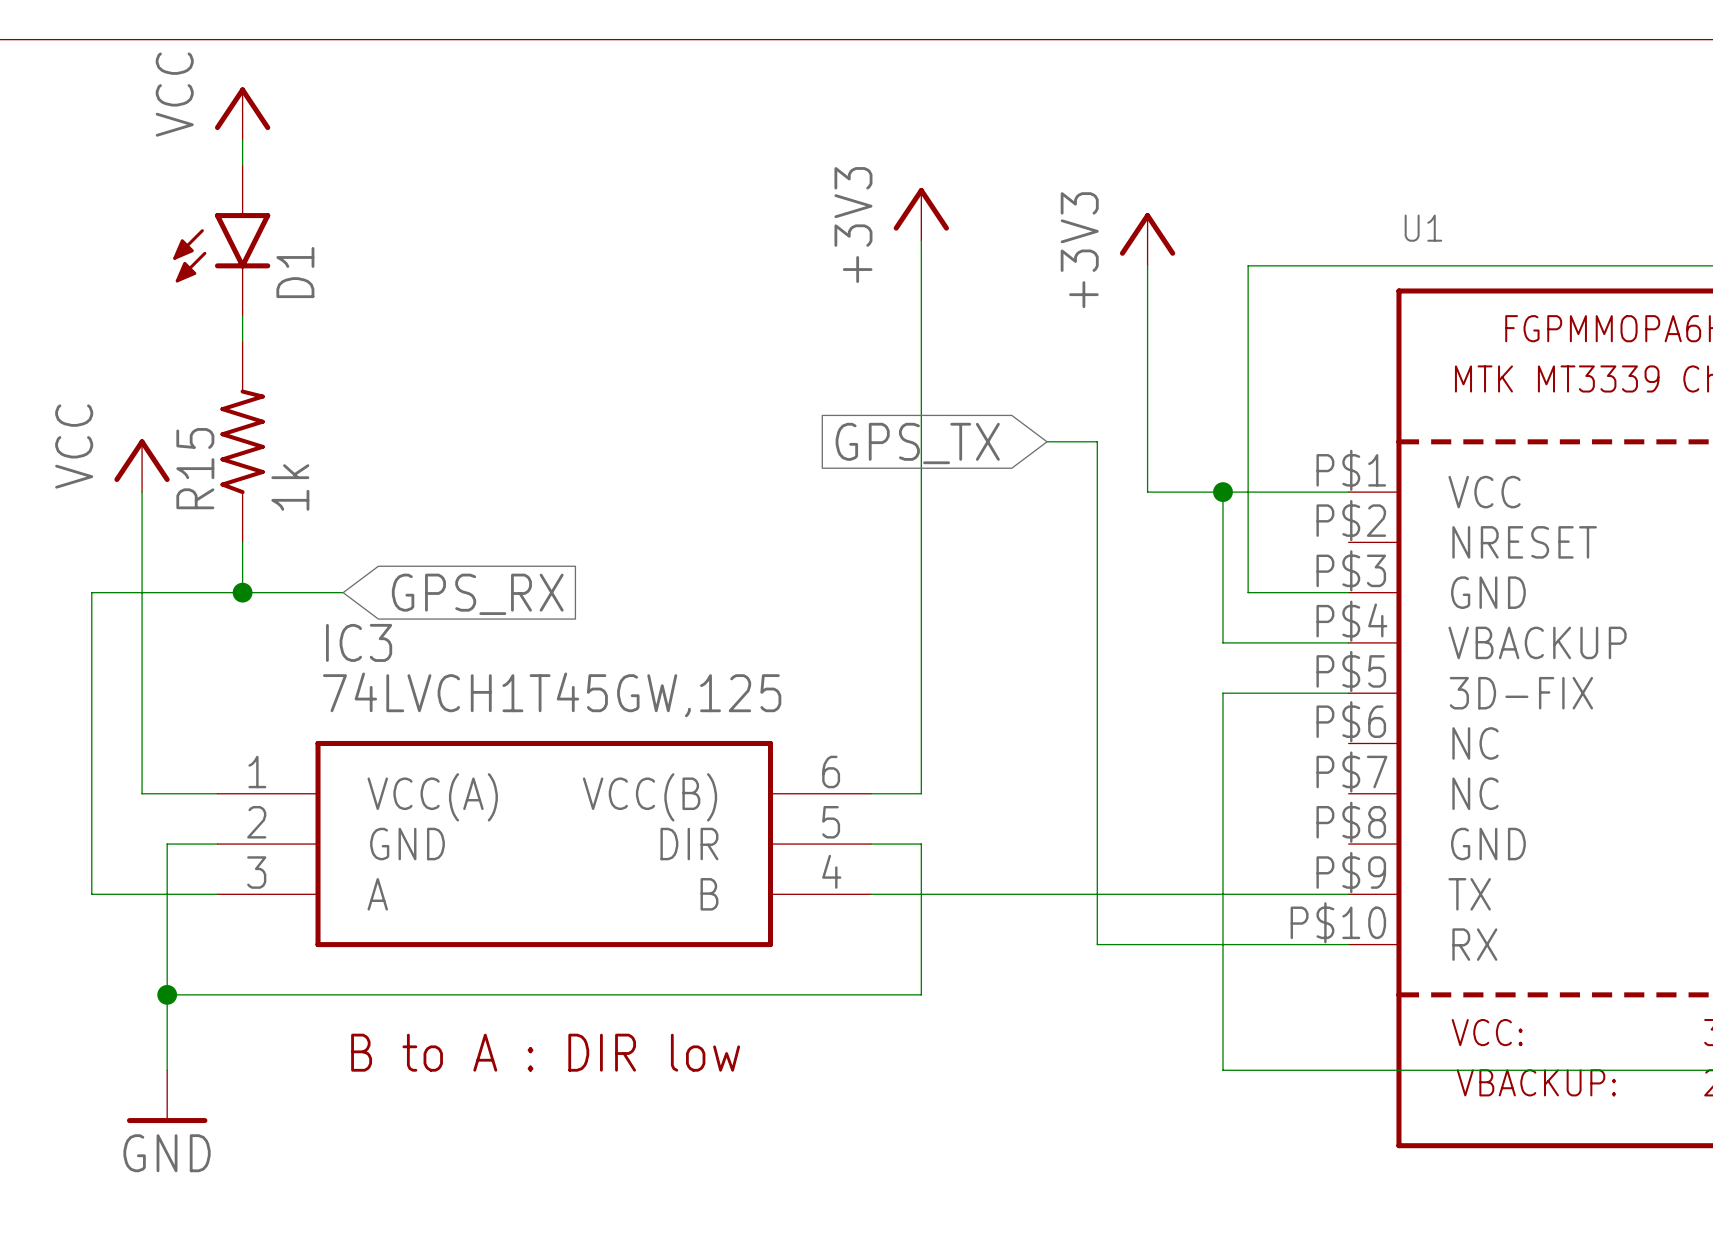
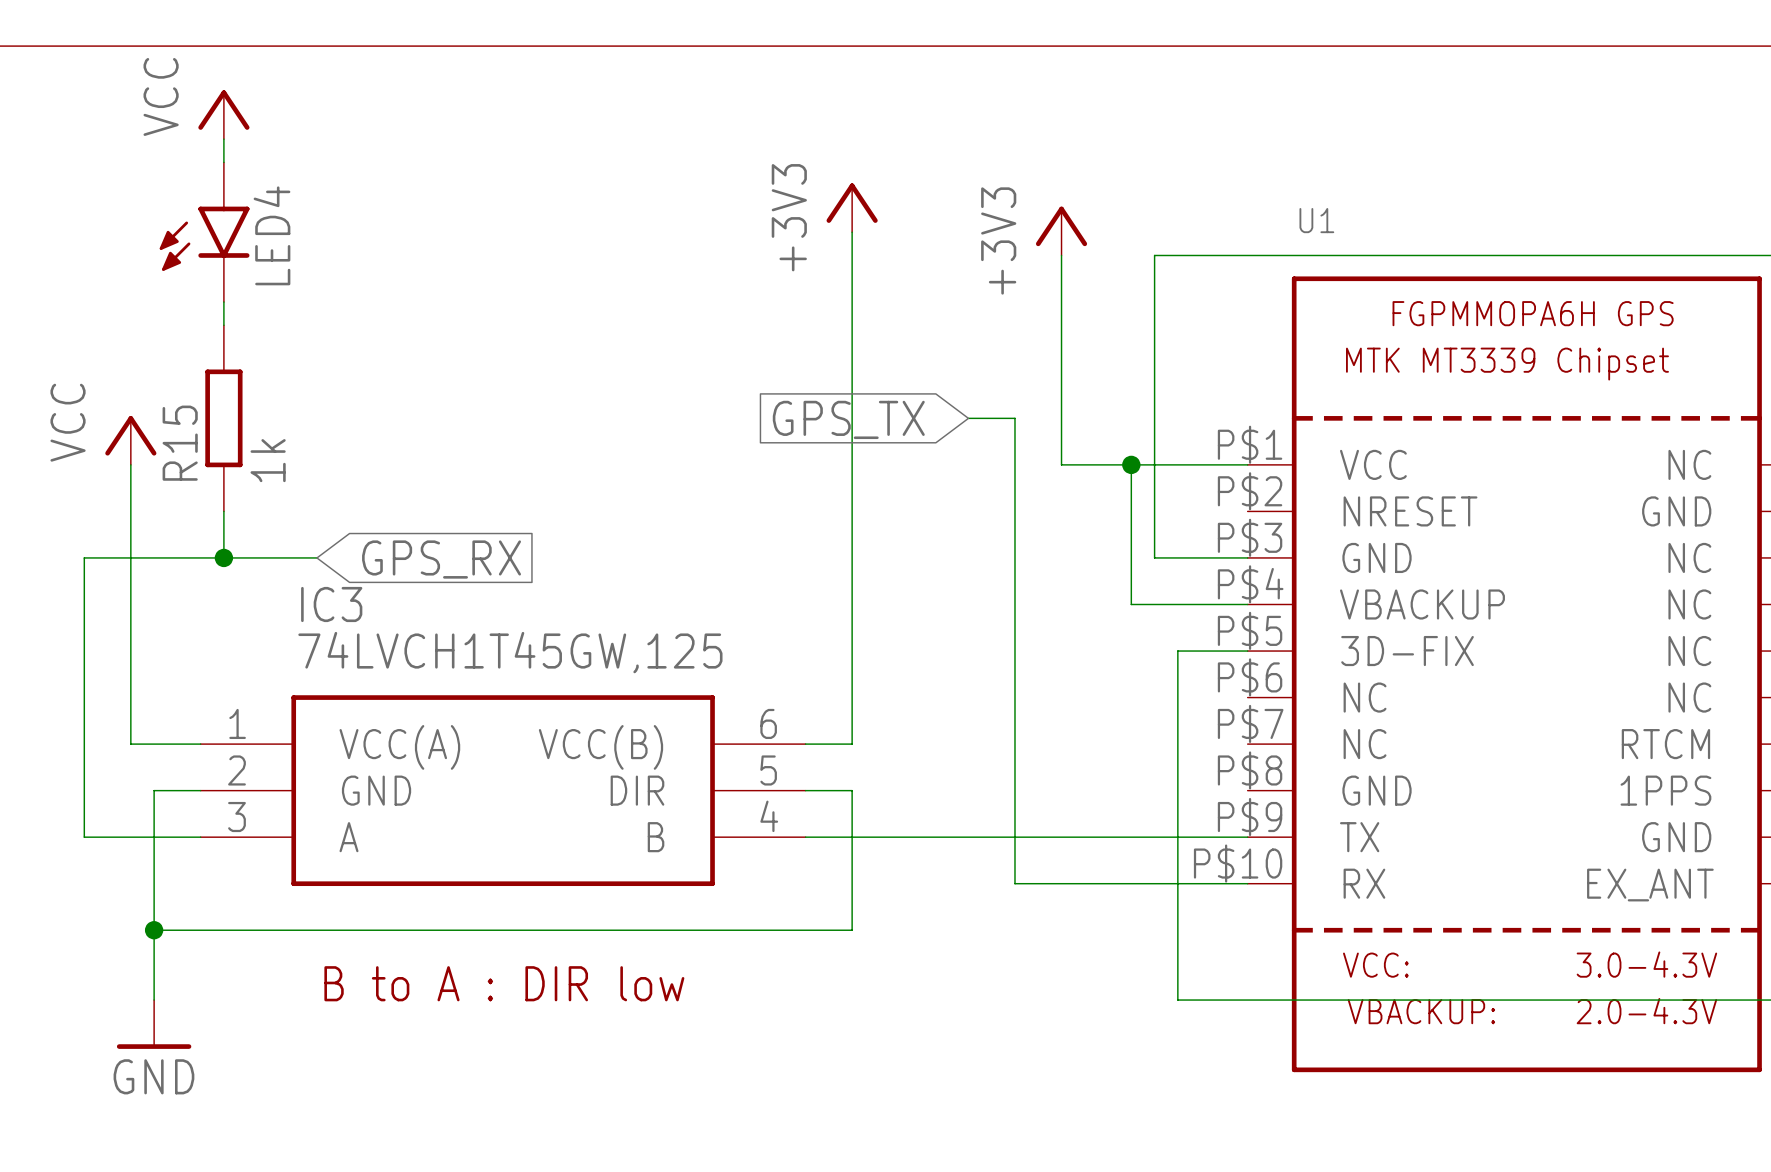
D1 name: D1 (295, 272) -> LED4 (272, 235)
R15 symbol: [220, 341, 265, 543] -> [205, 325, 243, 512]
wire: (1273, 693) (1222, 693) (1222, 1070) (1273, 1070) -> (1177, 651) (1177, 1000)

